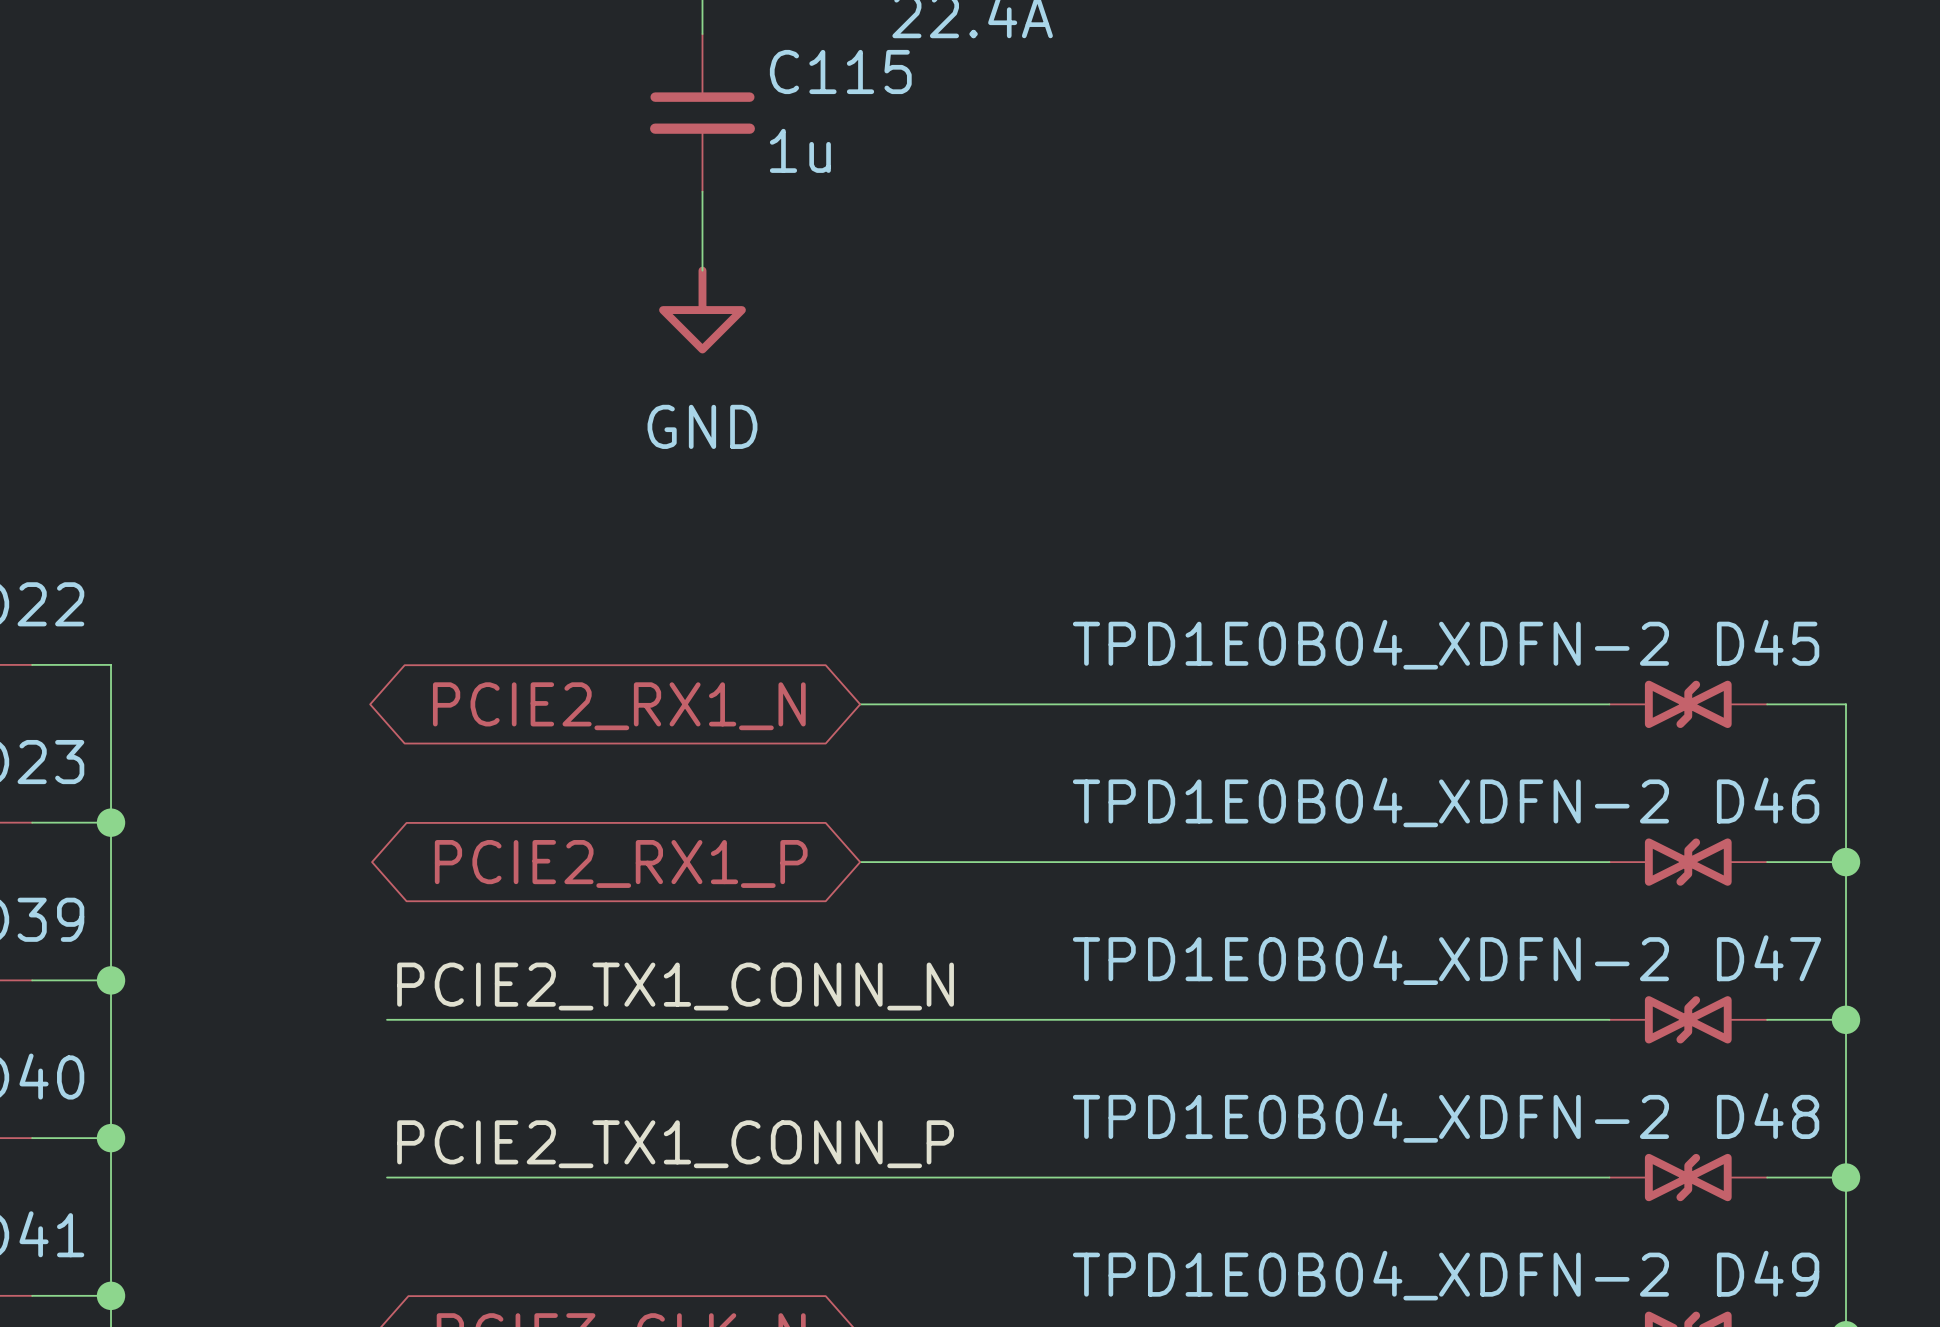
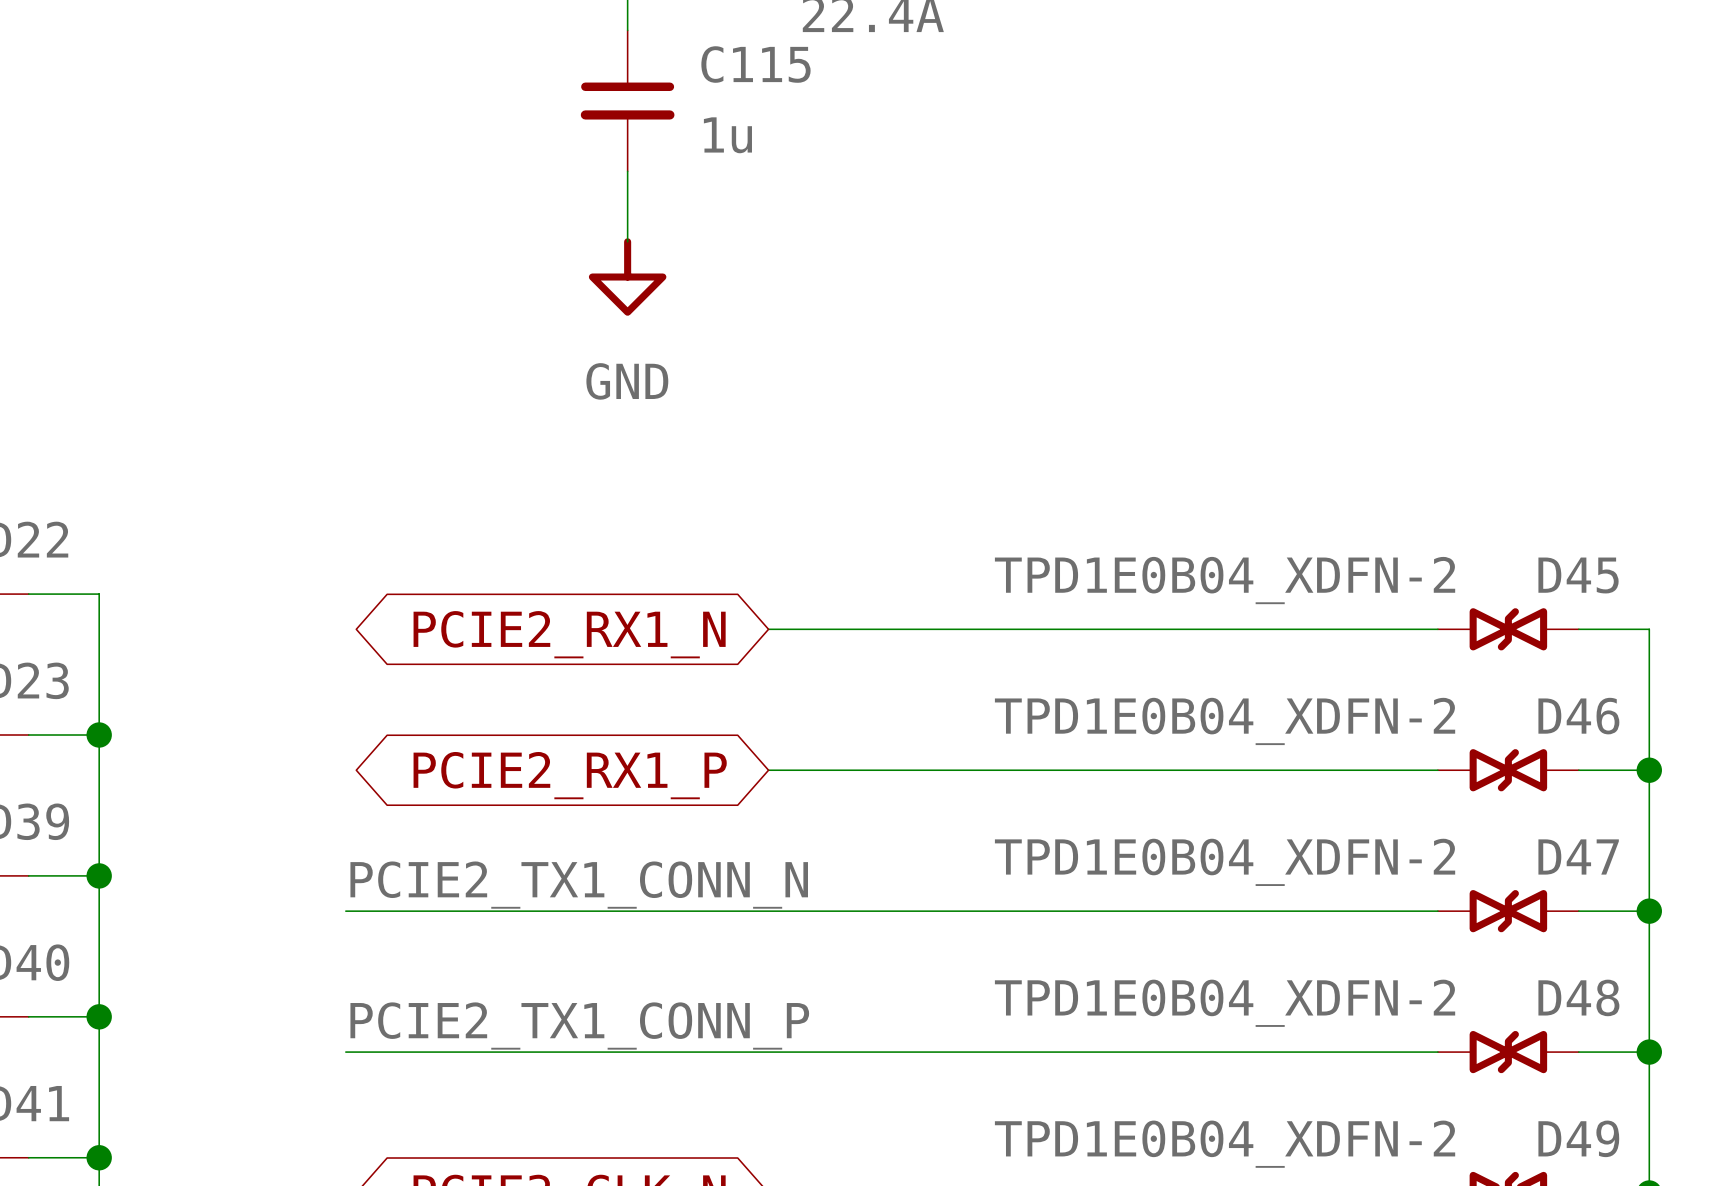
C115 name position: C115 (840, 71) -> C115 (755, 64)
C115 text position: 1u (800, 150) -> 1u (727, 135)

